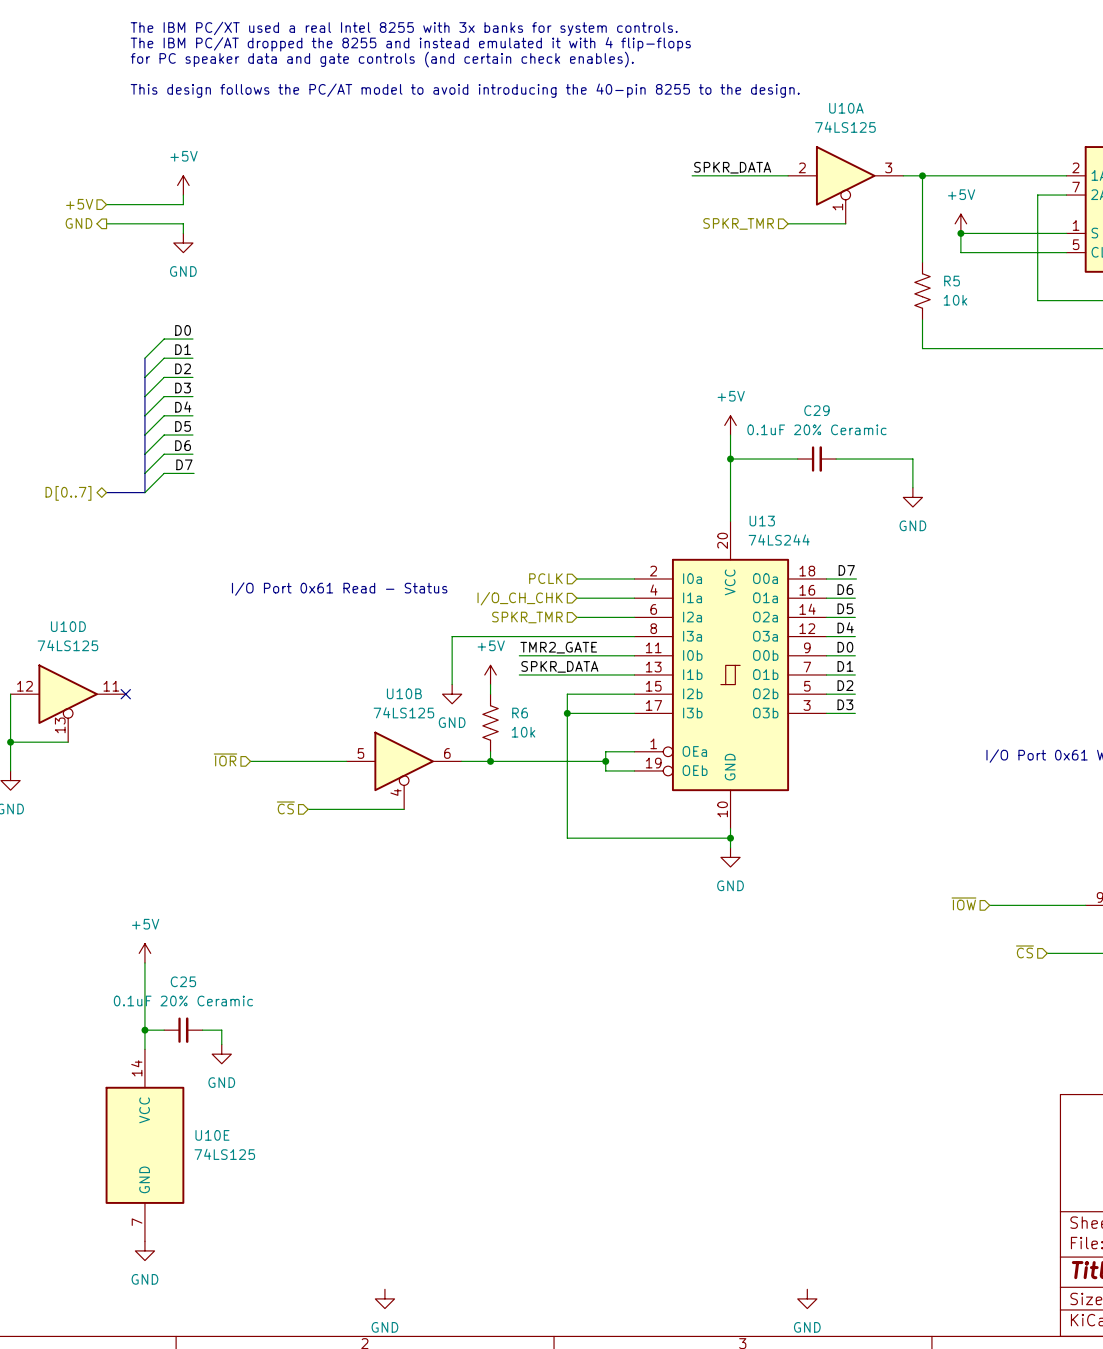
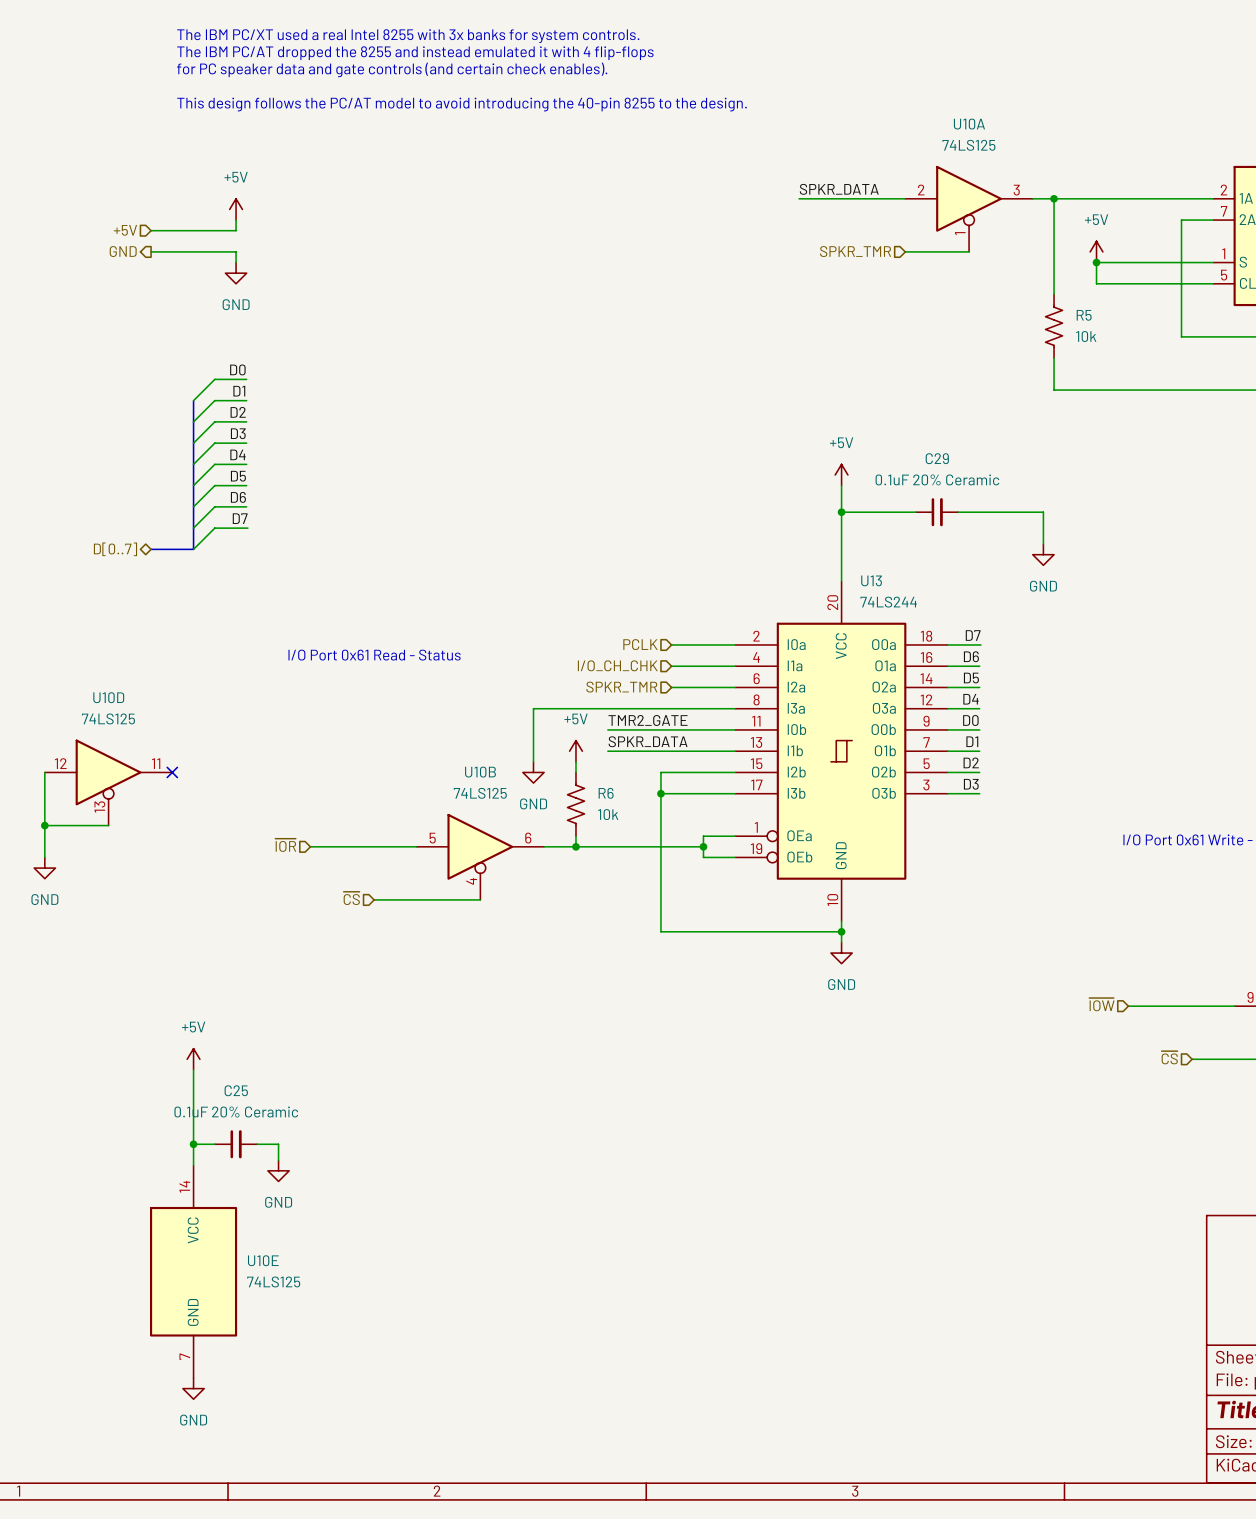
power symbol: GND (384, 1298) -> none
power symbol: GND (807, 1298) -> none

